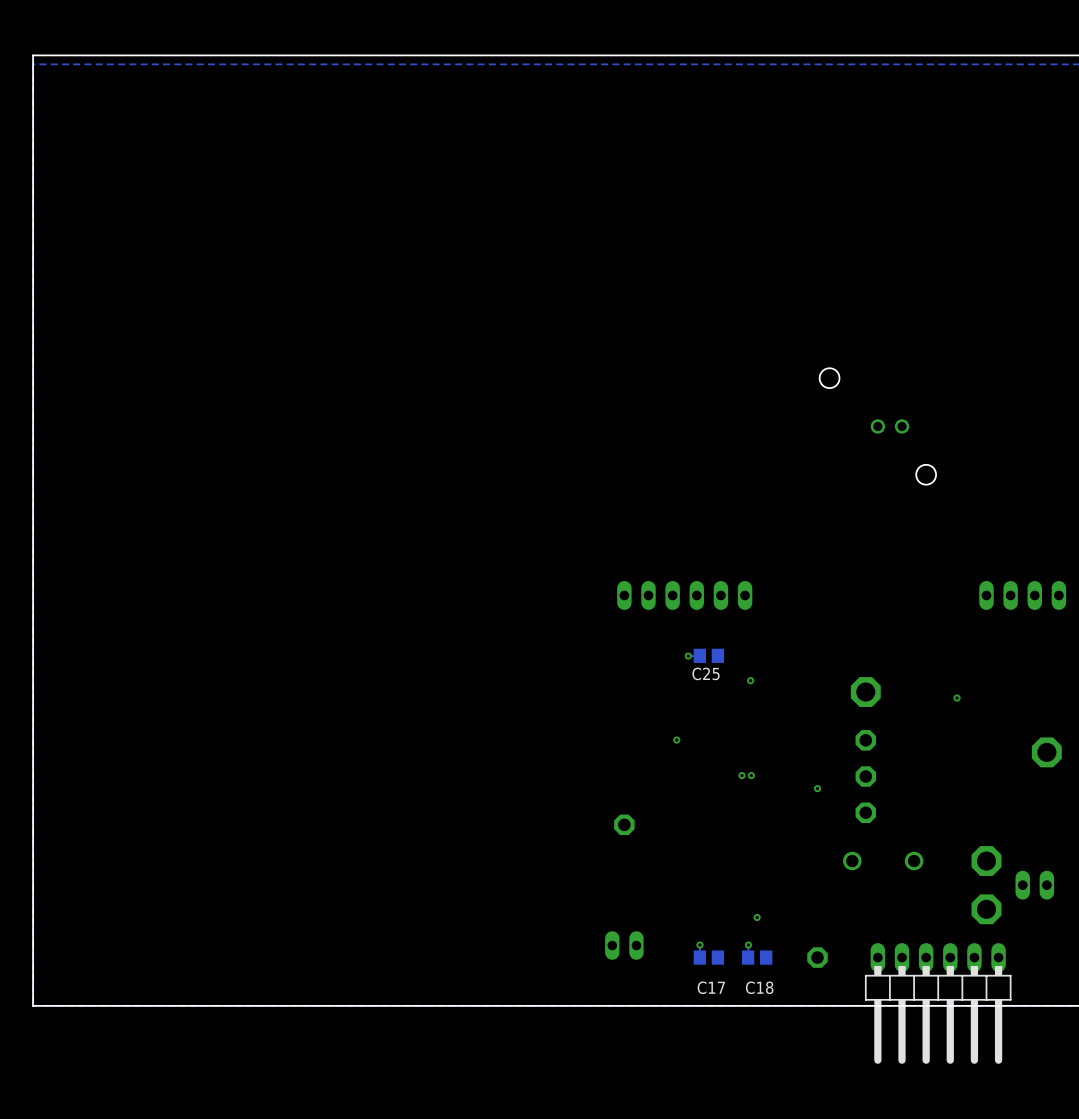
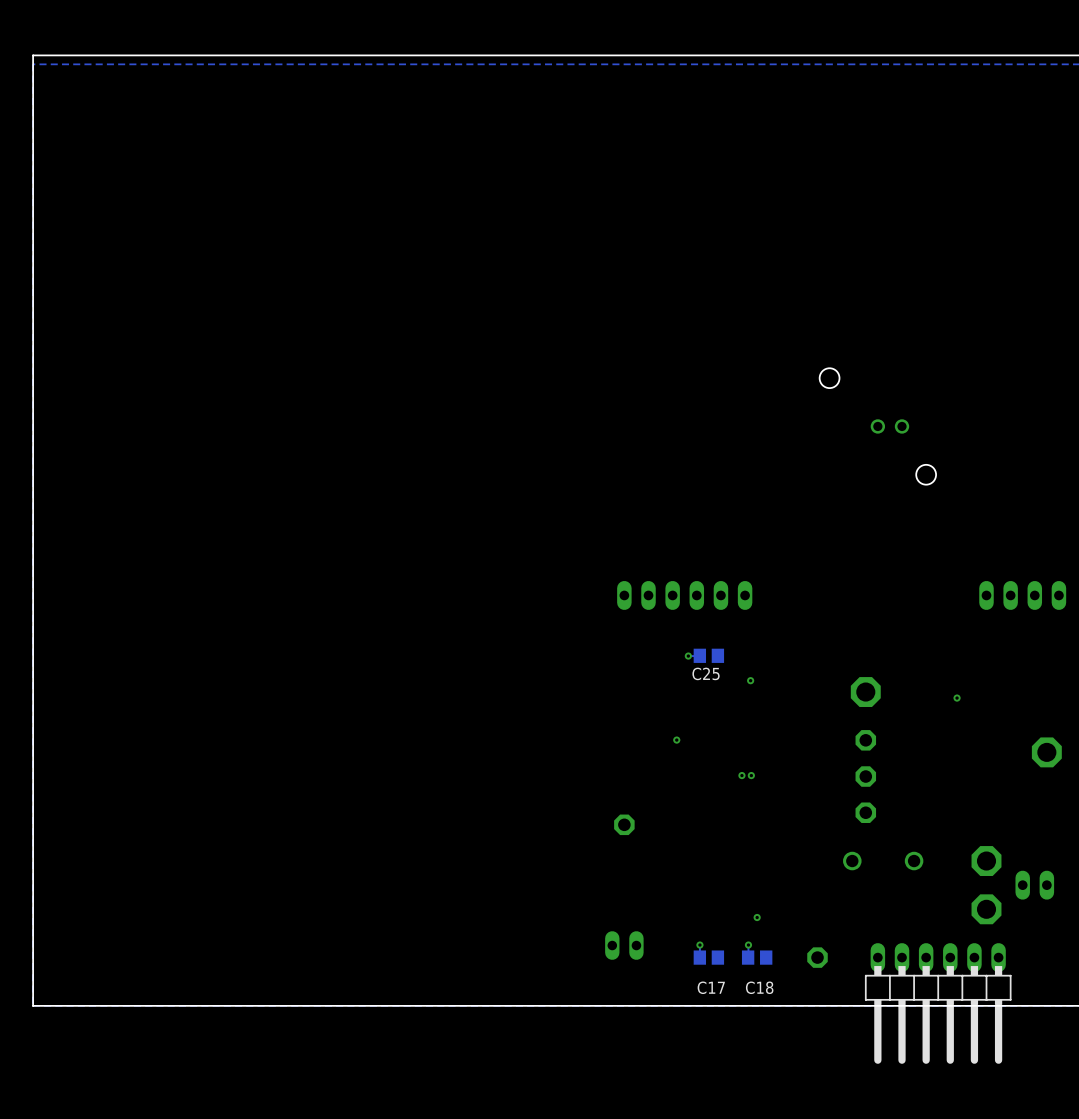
via: (817, 788) -> none

